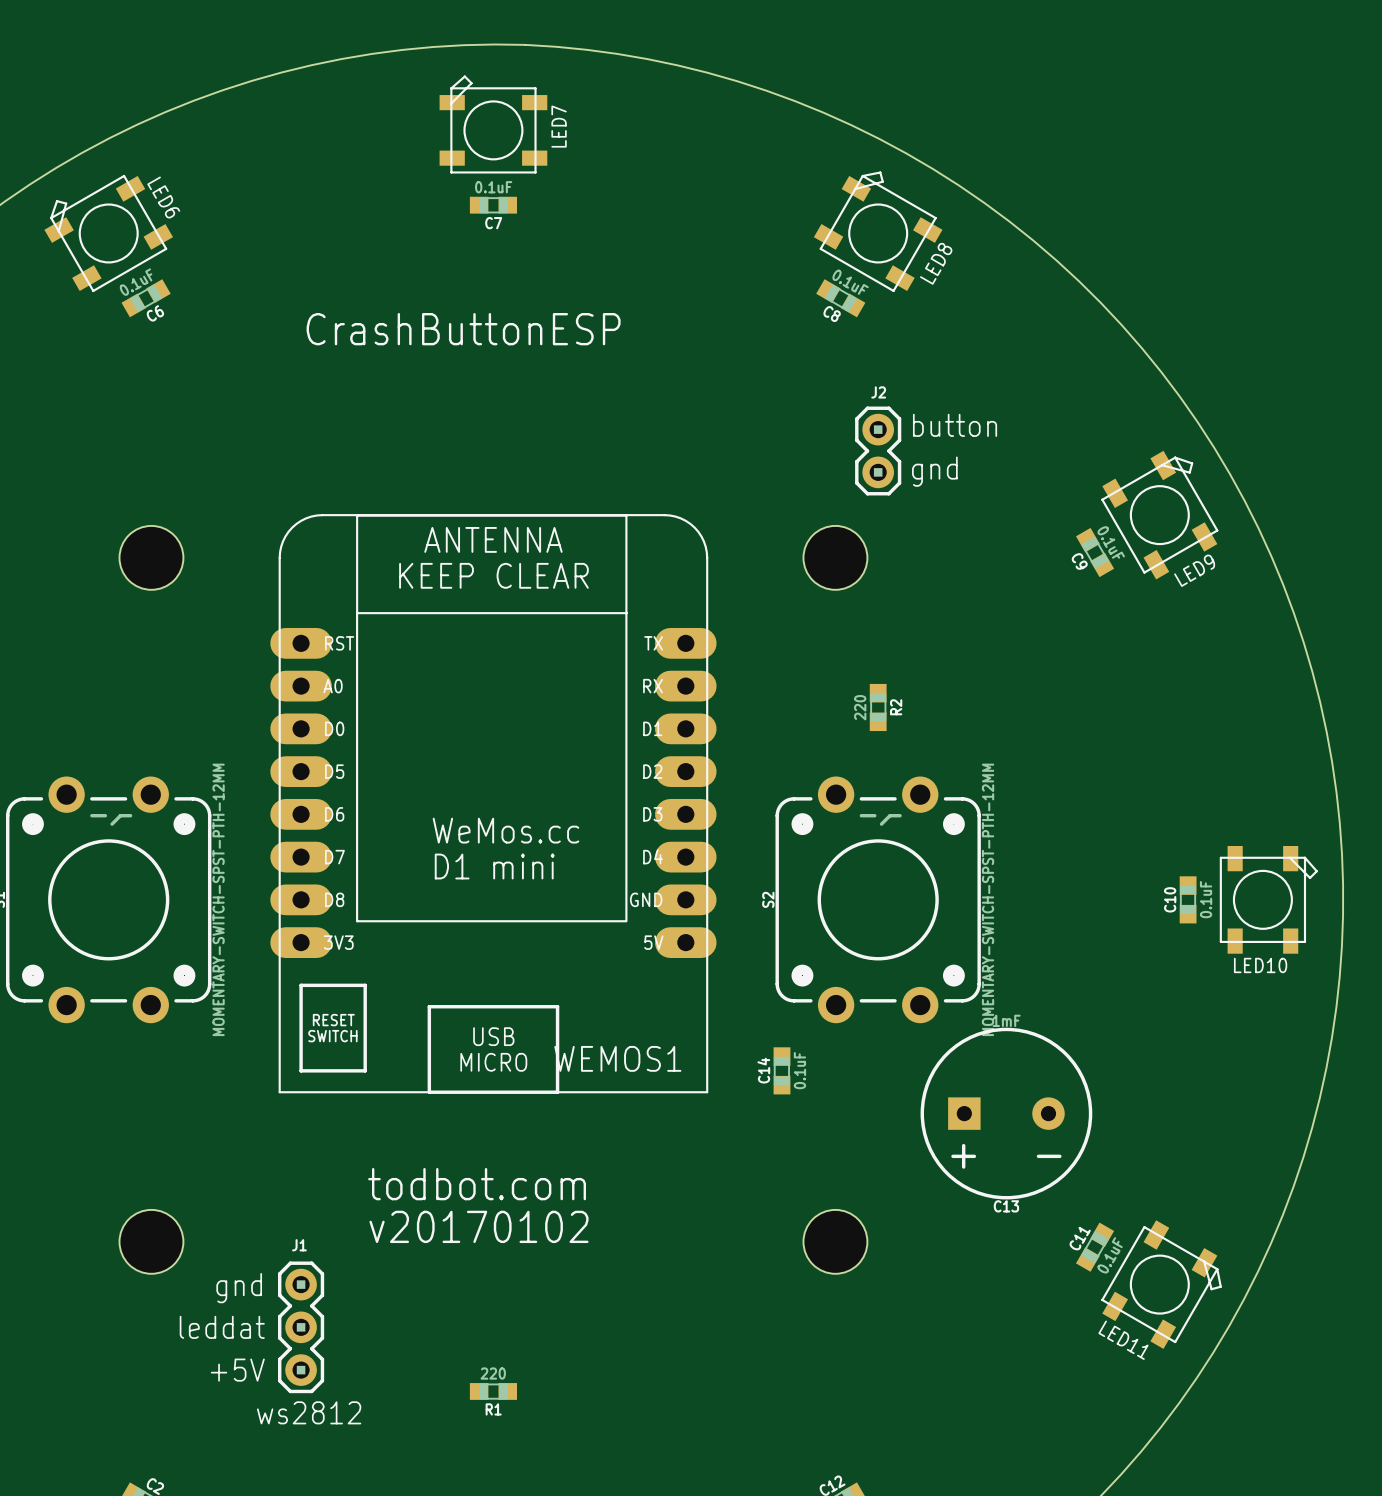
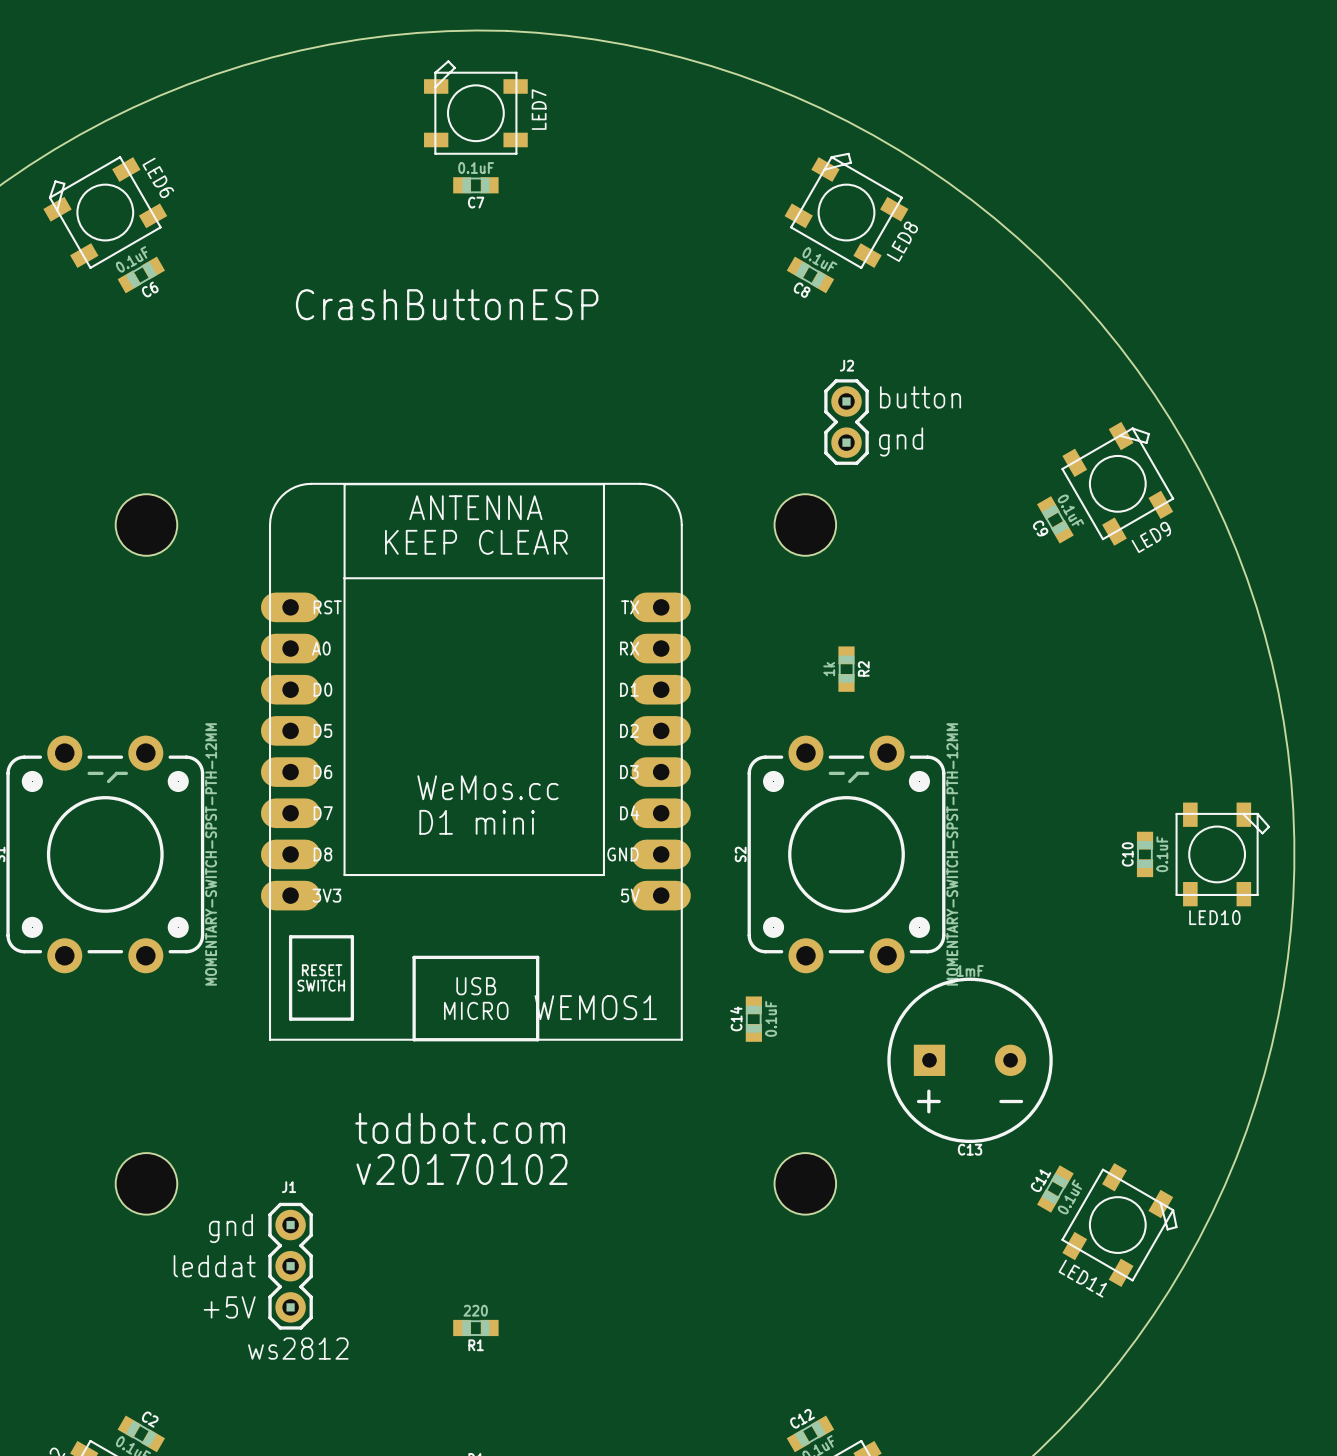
R2 value: 220 (860, 707) -> 1k (829, 669)

